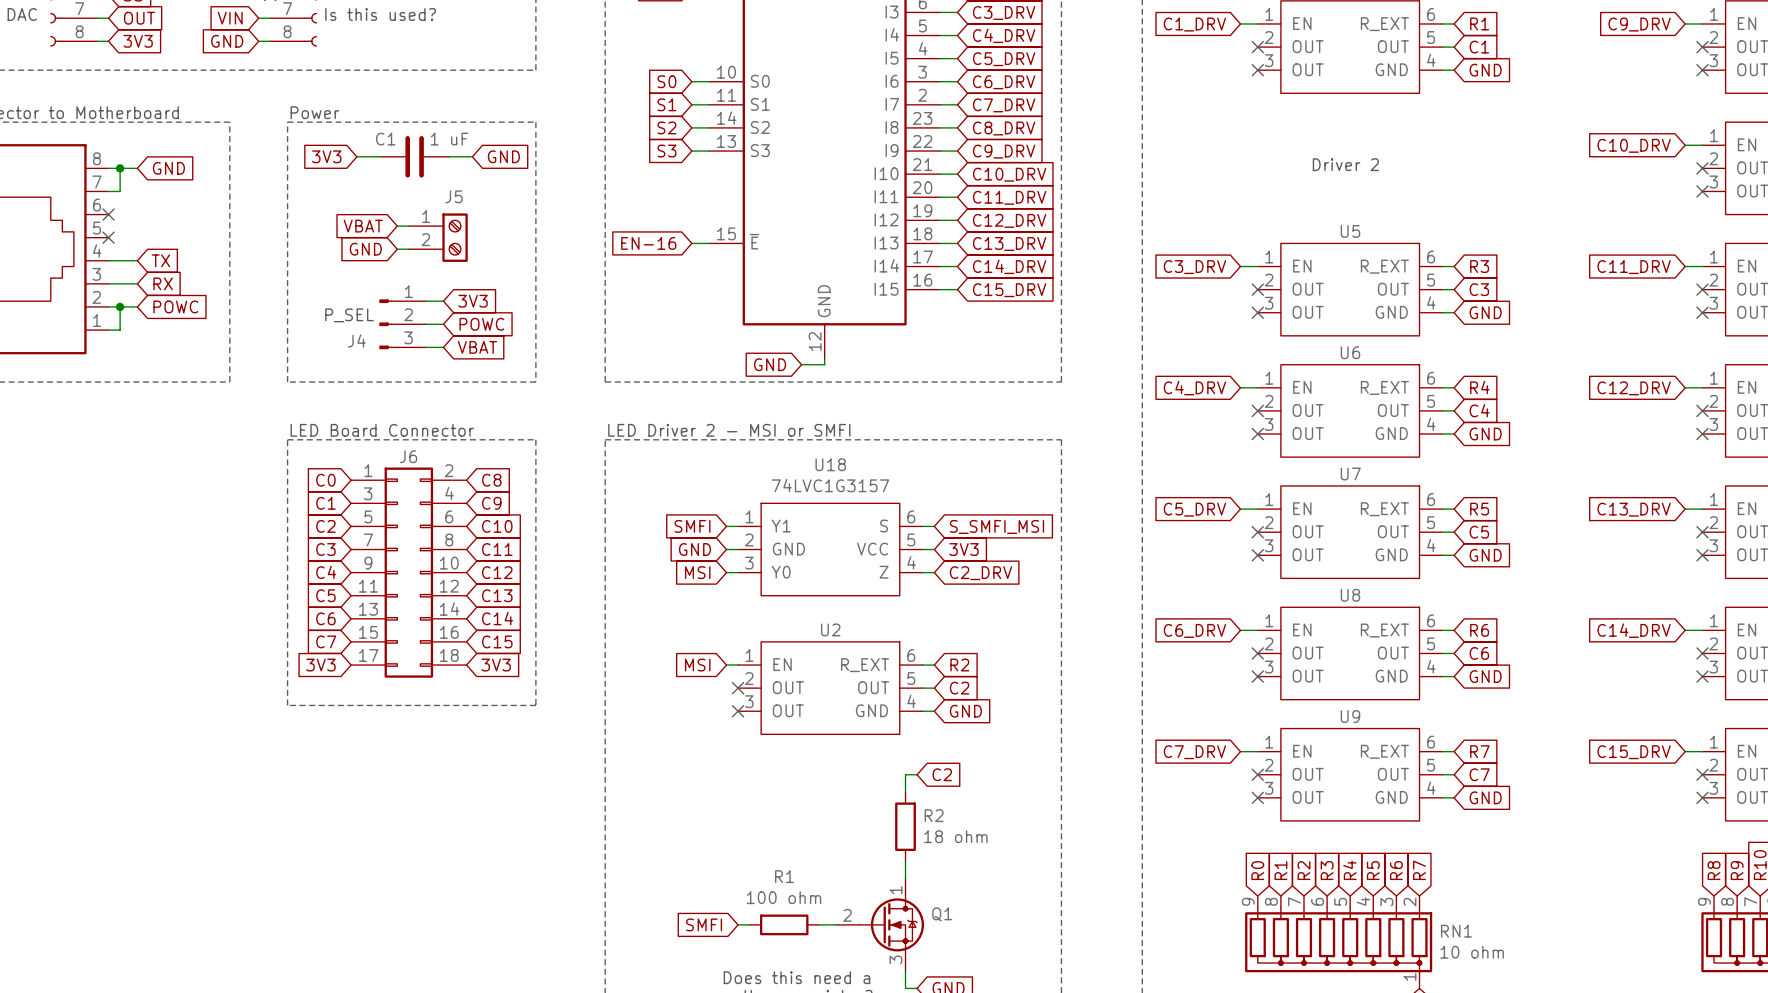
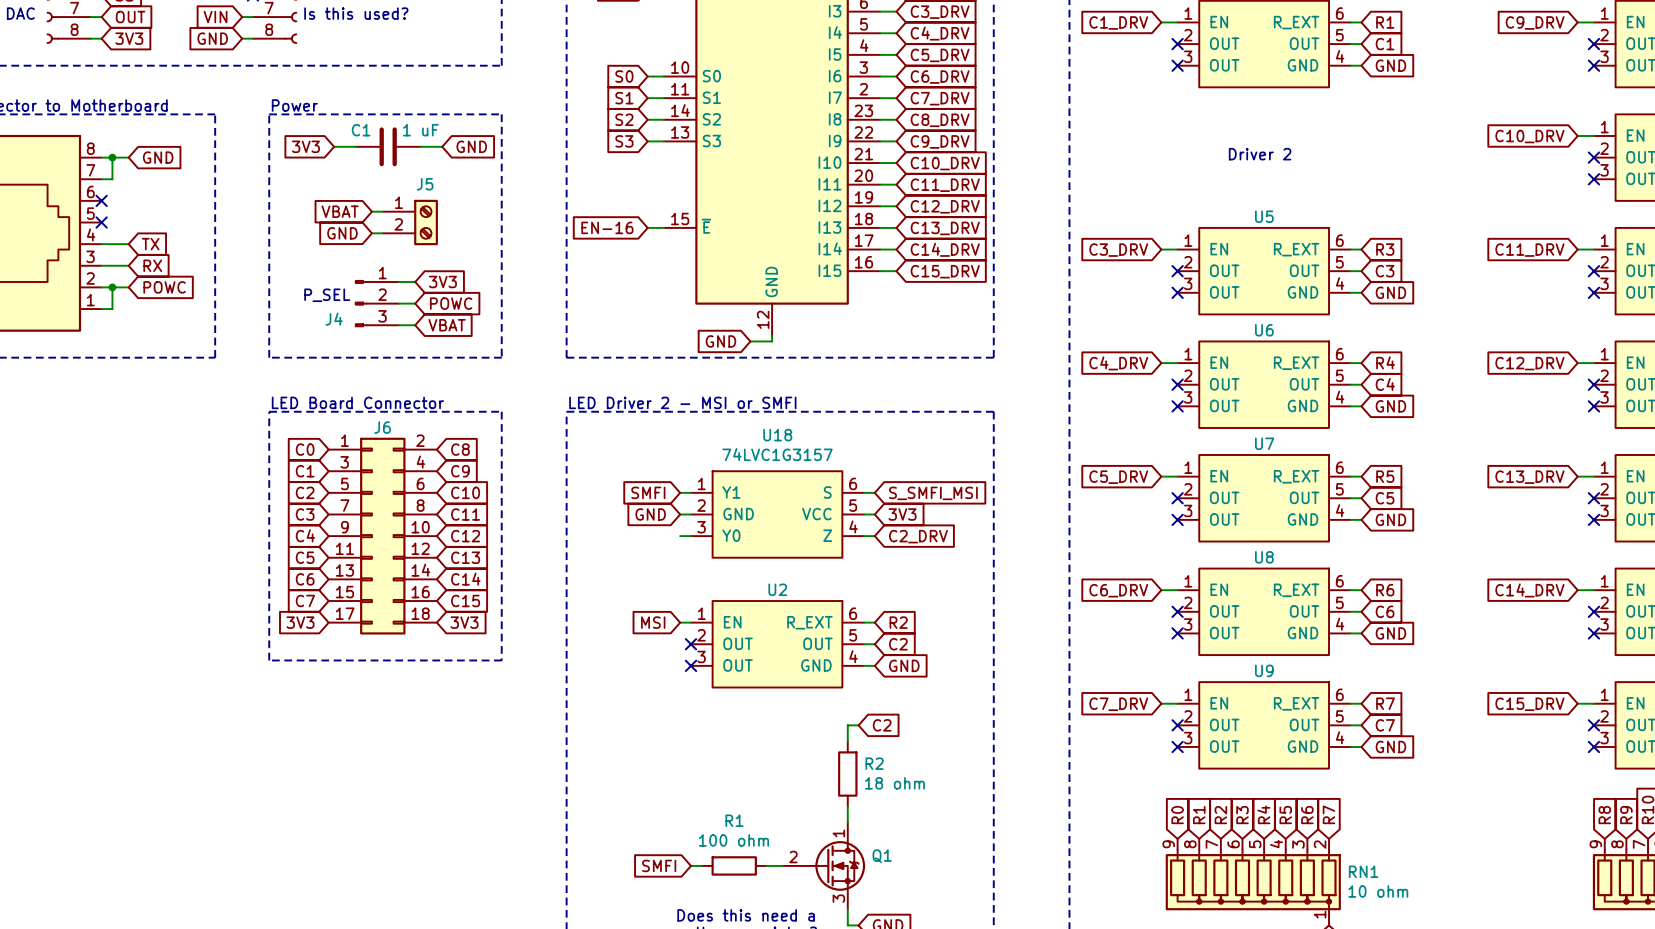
global label: MSI (697, 572) -> none

